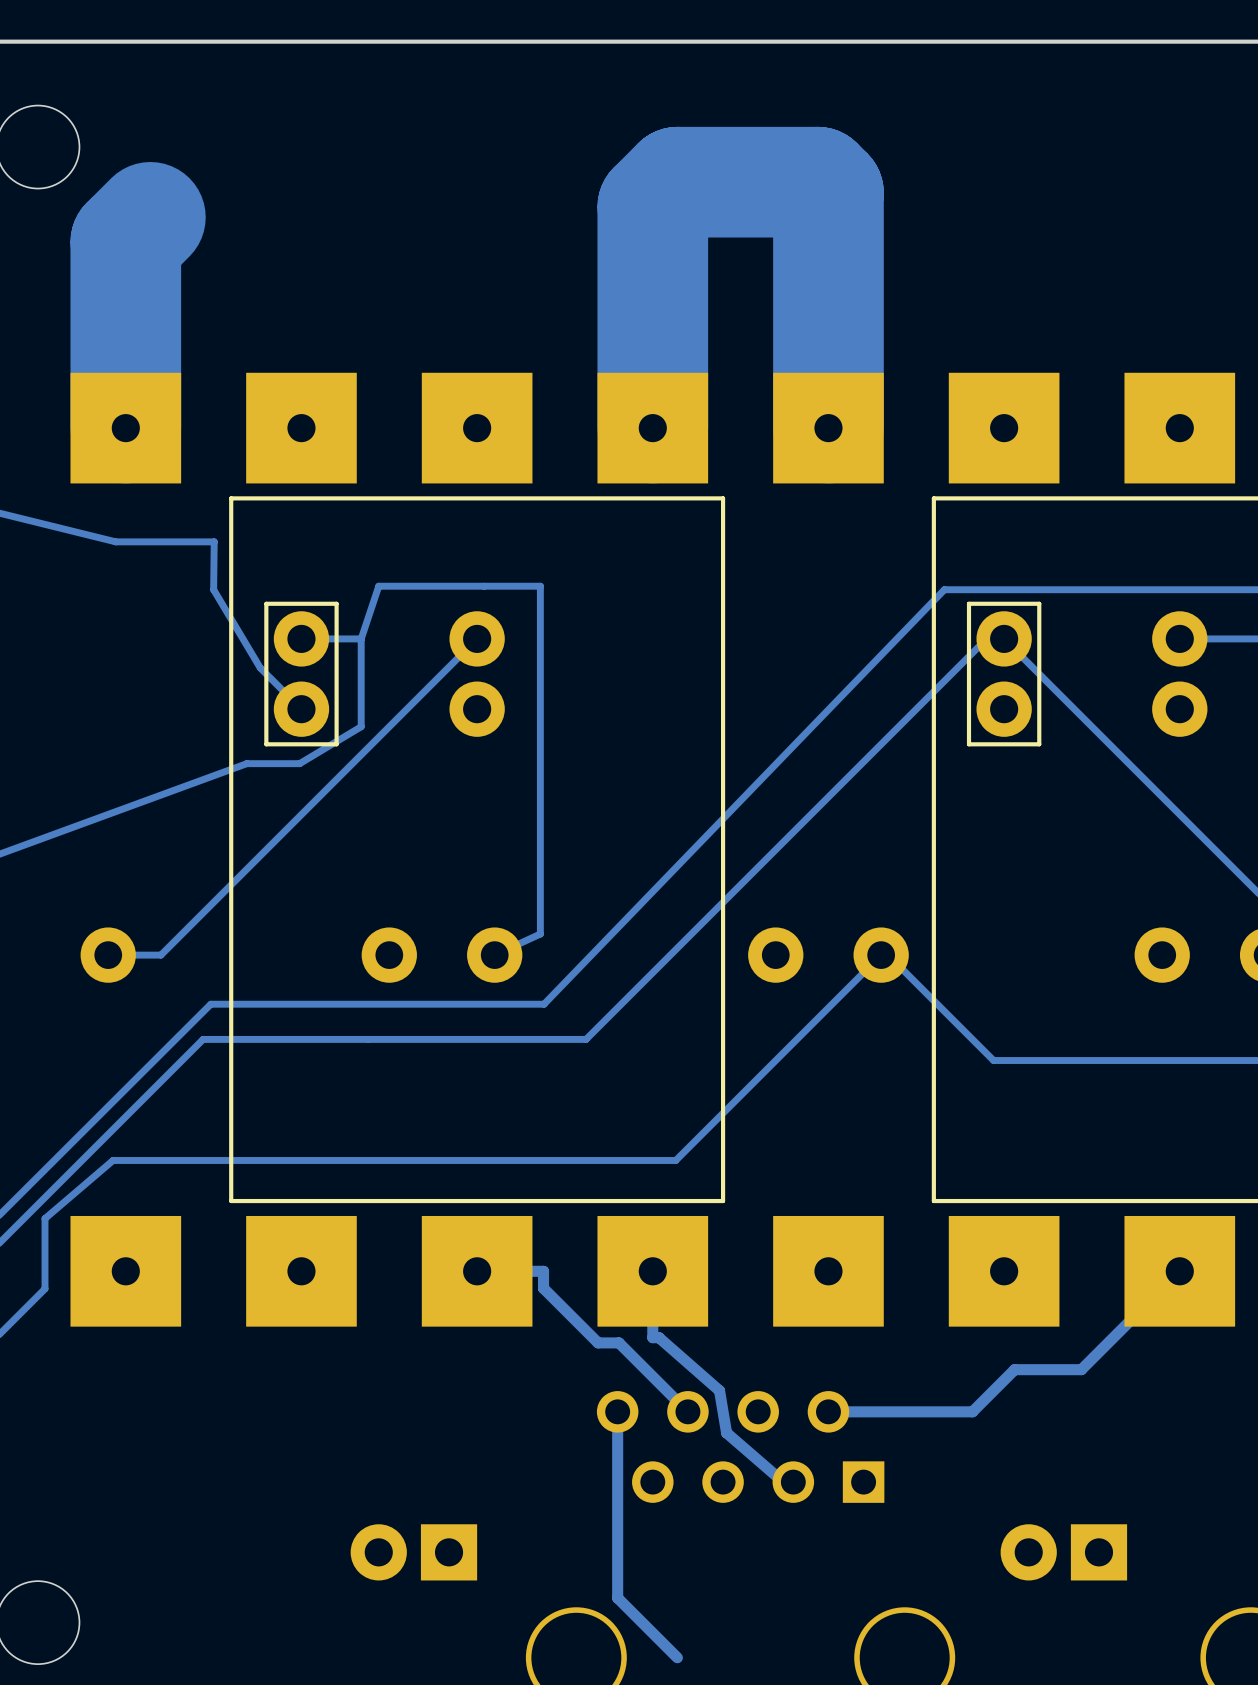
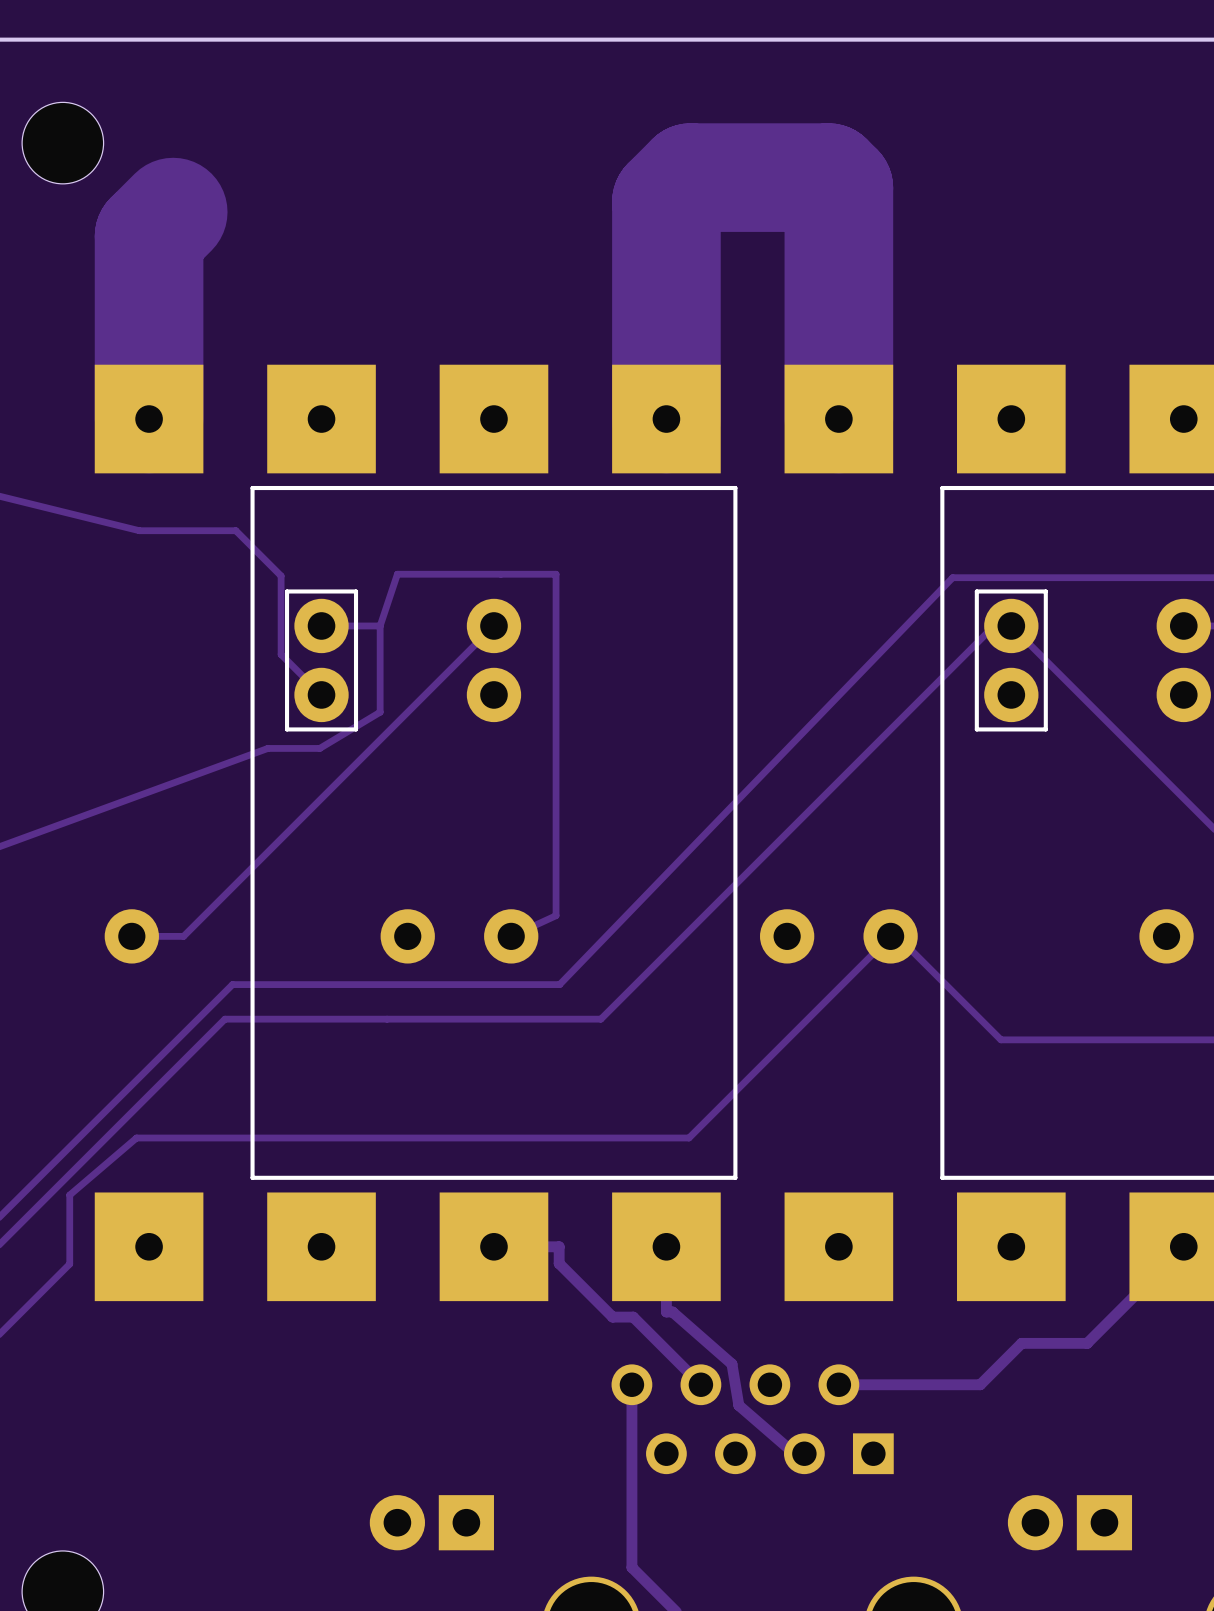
track: (214, 541) (213, 589) (260, 668) -> (235, 530) (281, 575) (281, 654)

